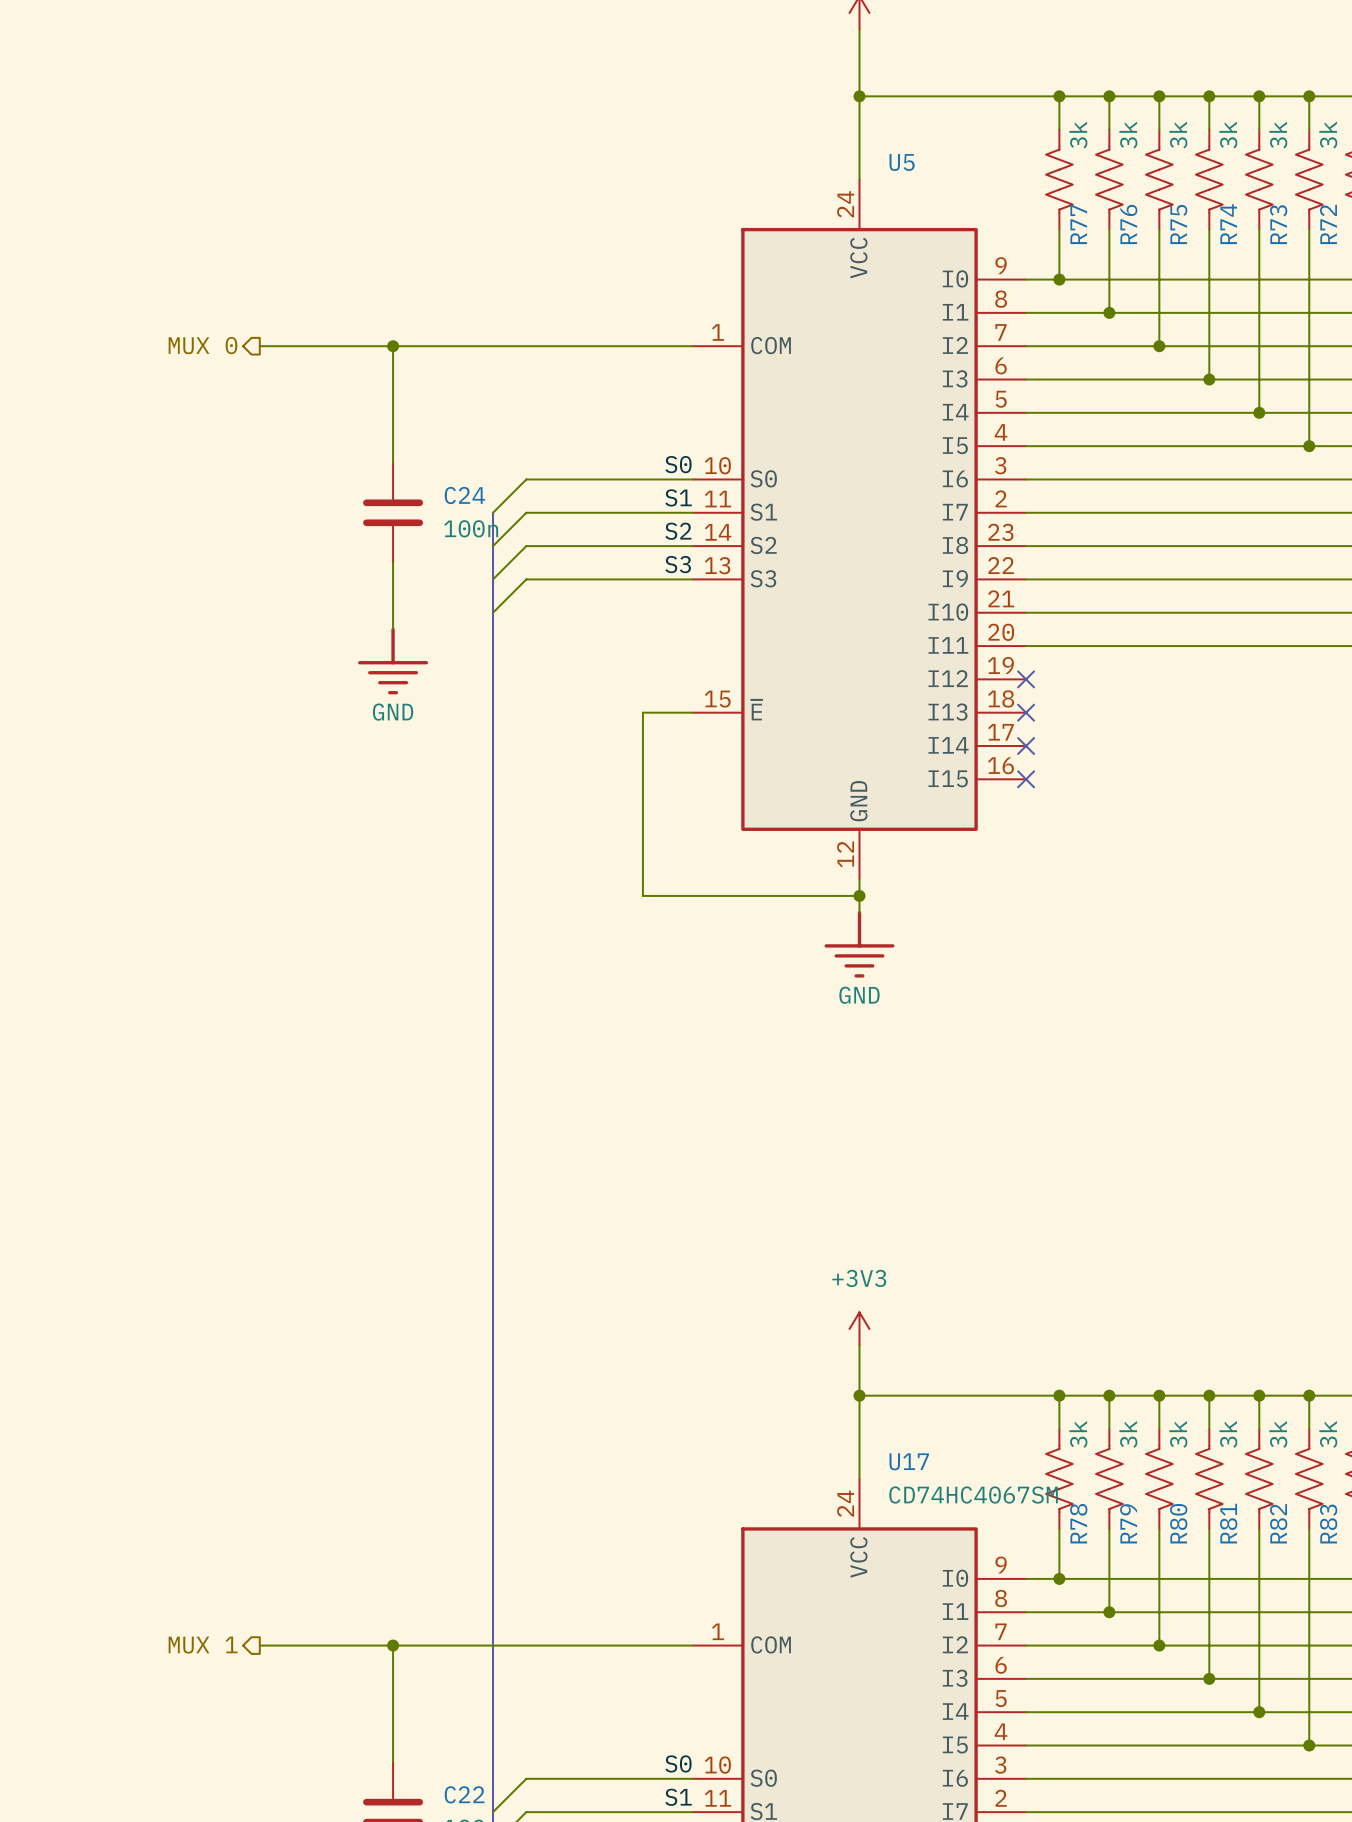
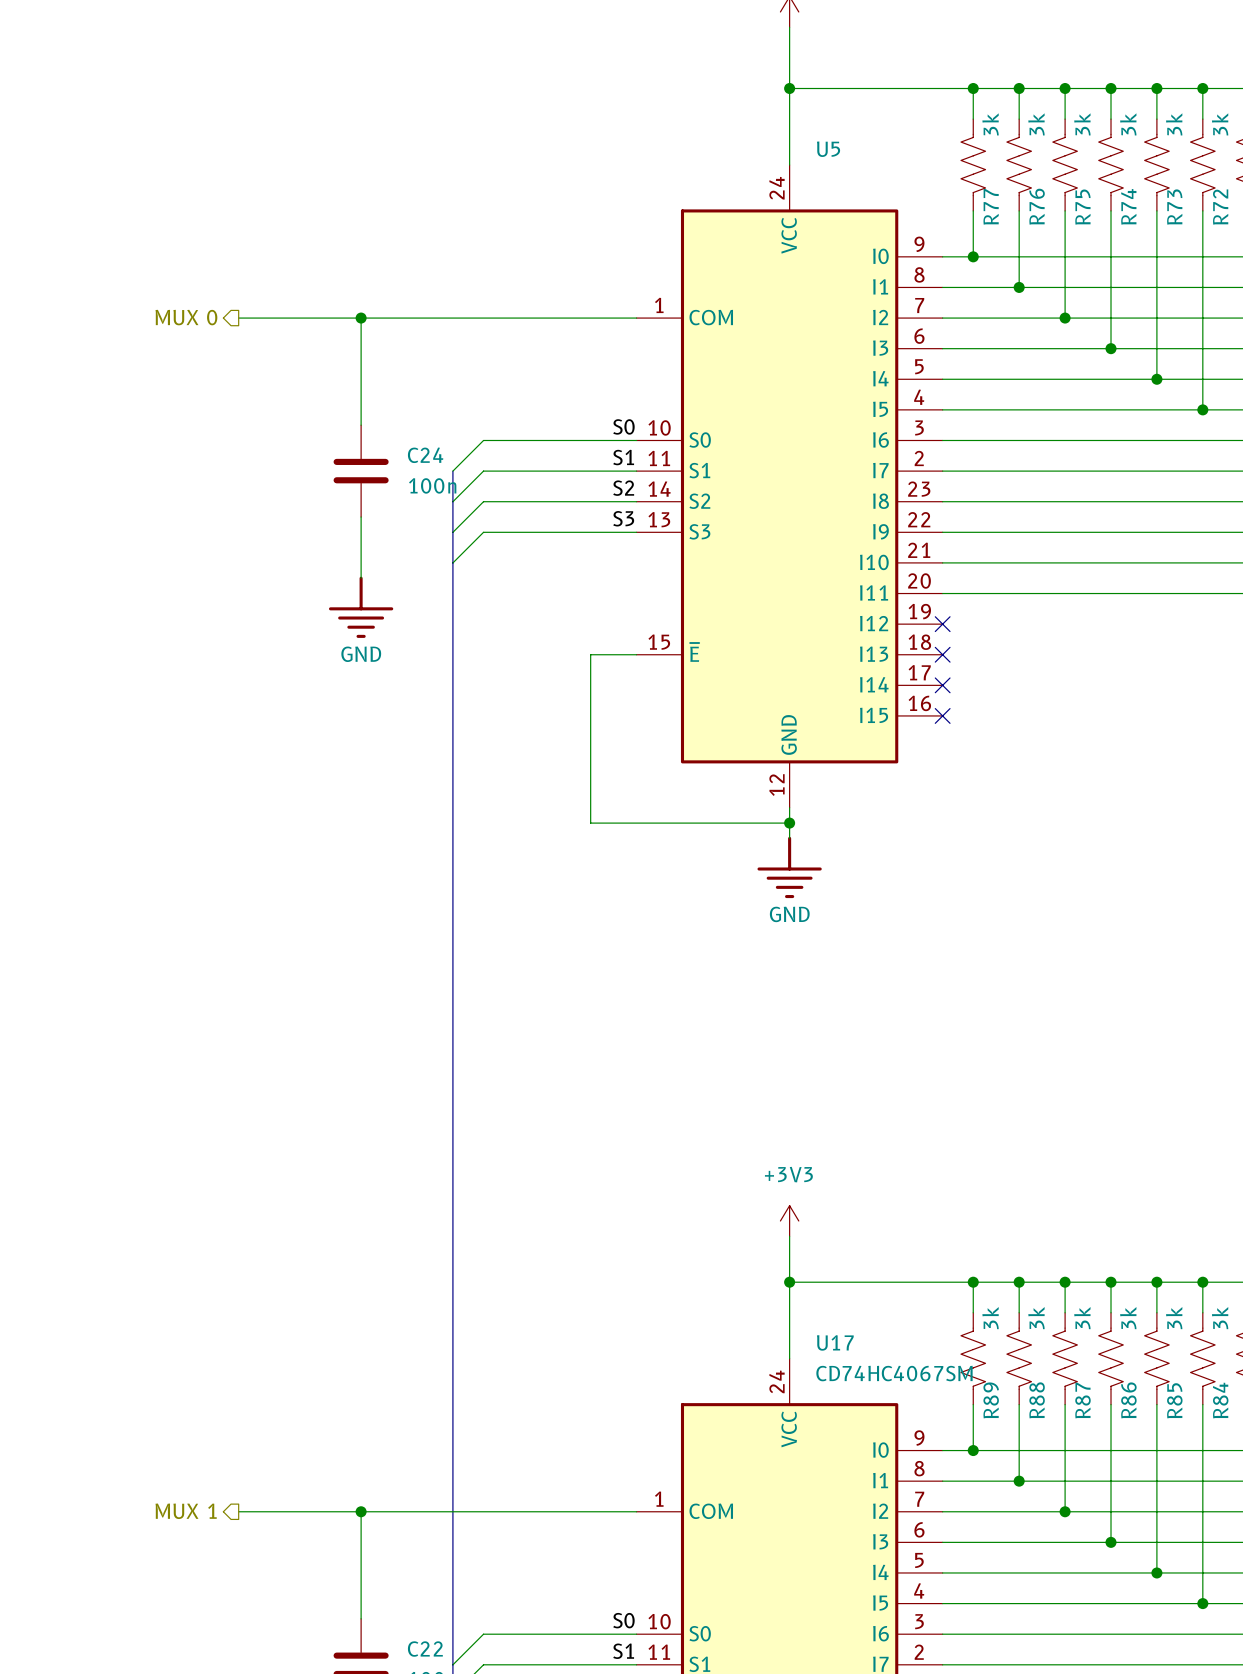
R78 name: R78 (1078, 1523) -> R89 (991, 1400)
R79 name: R79 (1128, 1523) -> R88 (1037, 1400)
R80 name: R80 (1178, 1523) -> R87 (1082, 1400)
R81 name: R81 (1228, 1523) -> R86 (1128, 1400)
R82 name: R82 (1278, 1523) -> R85 (1174, 1400)
R83 name: R83 (1328, 1524) -> R84 (1220, 1400)

